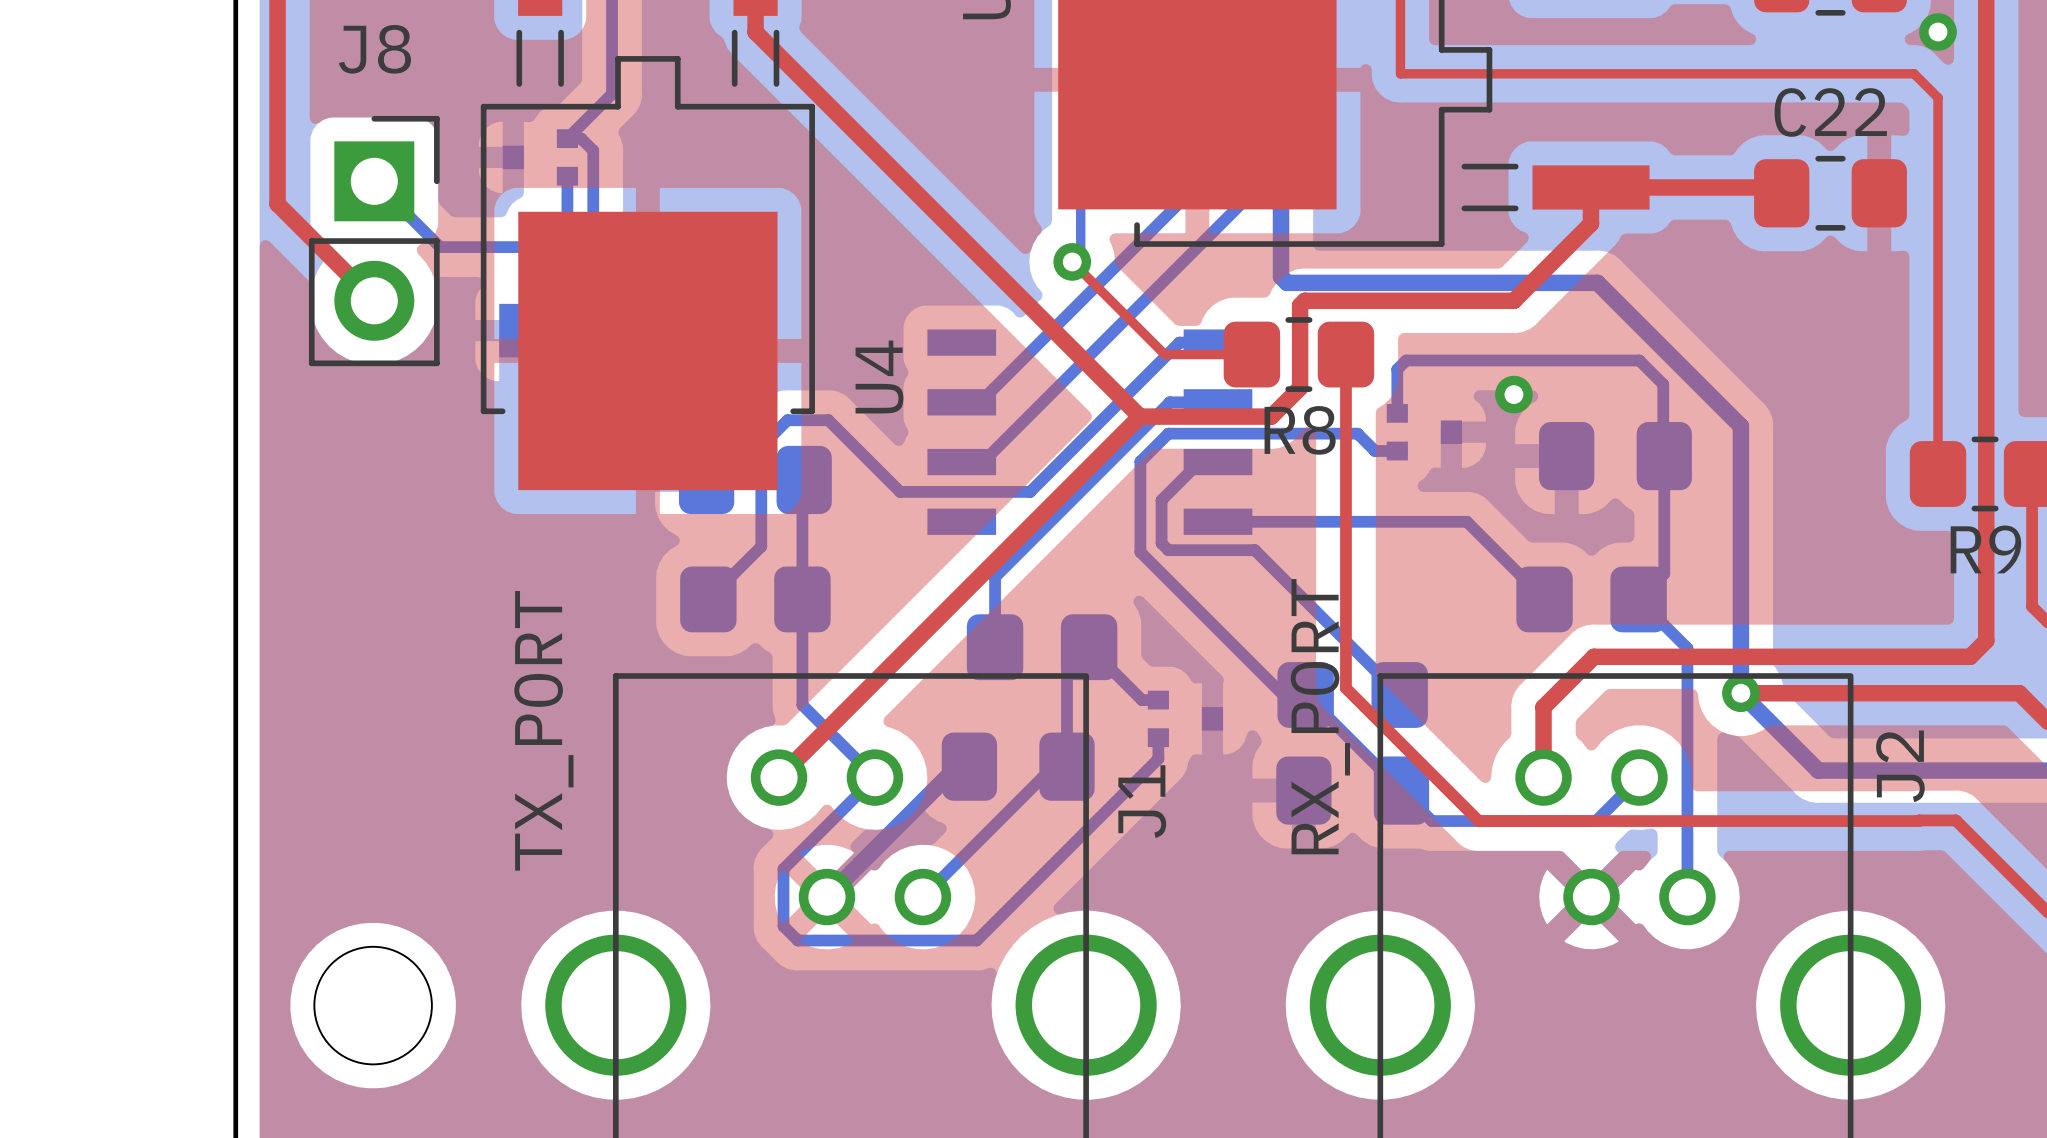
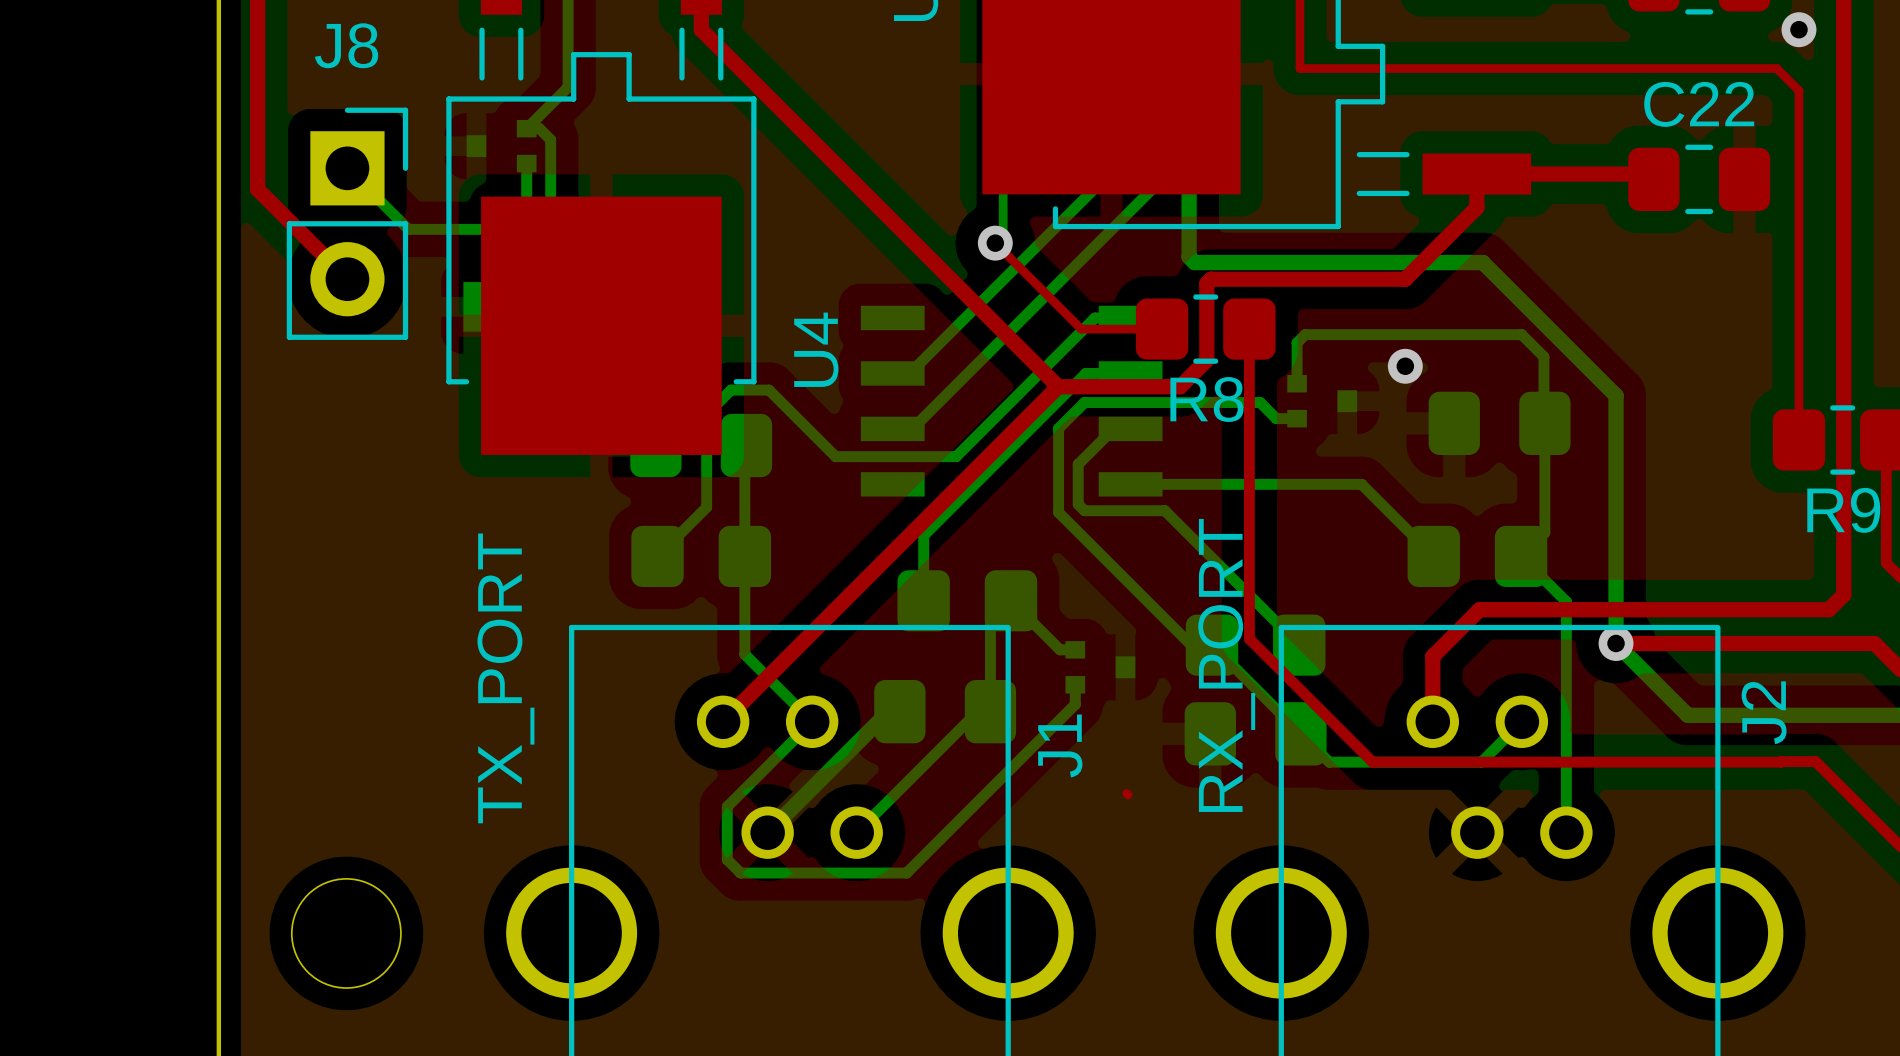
top track: none -> (1126, 793) (1128, 794)

